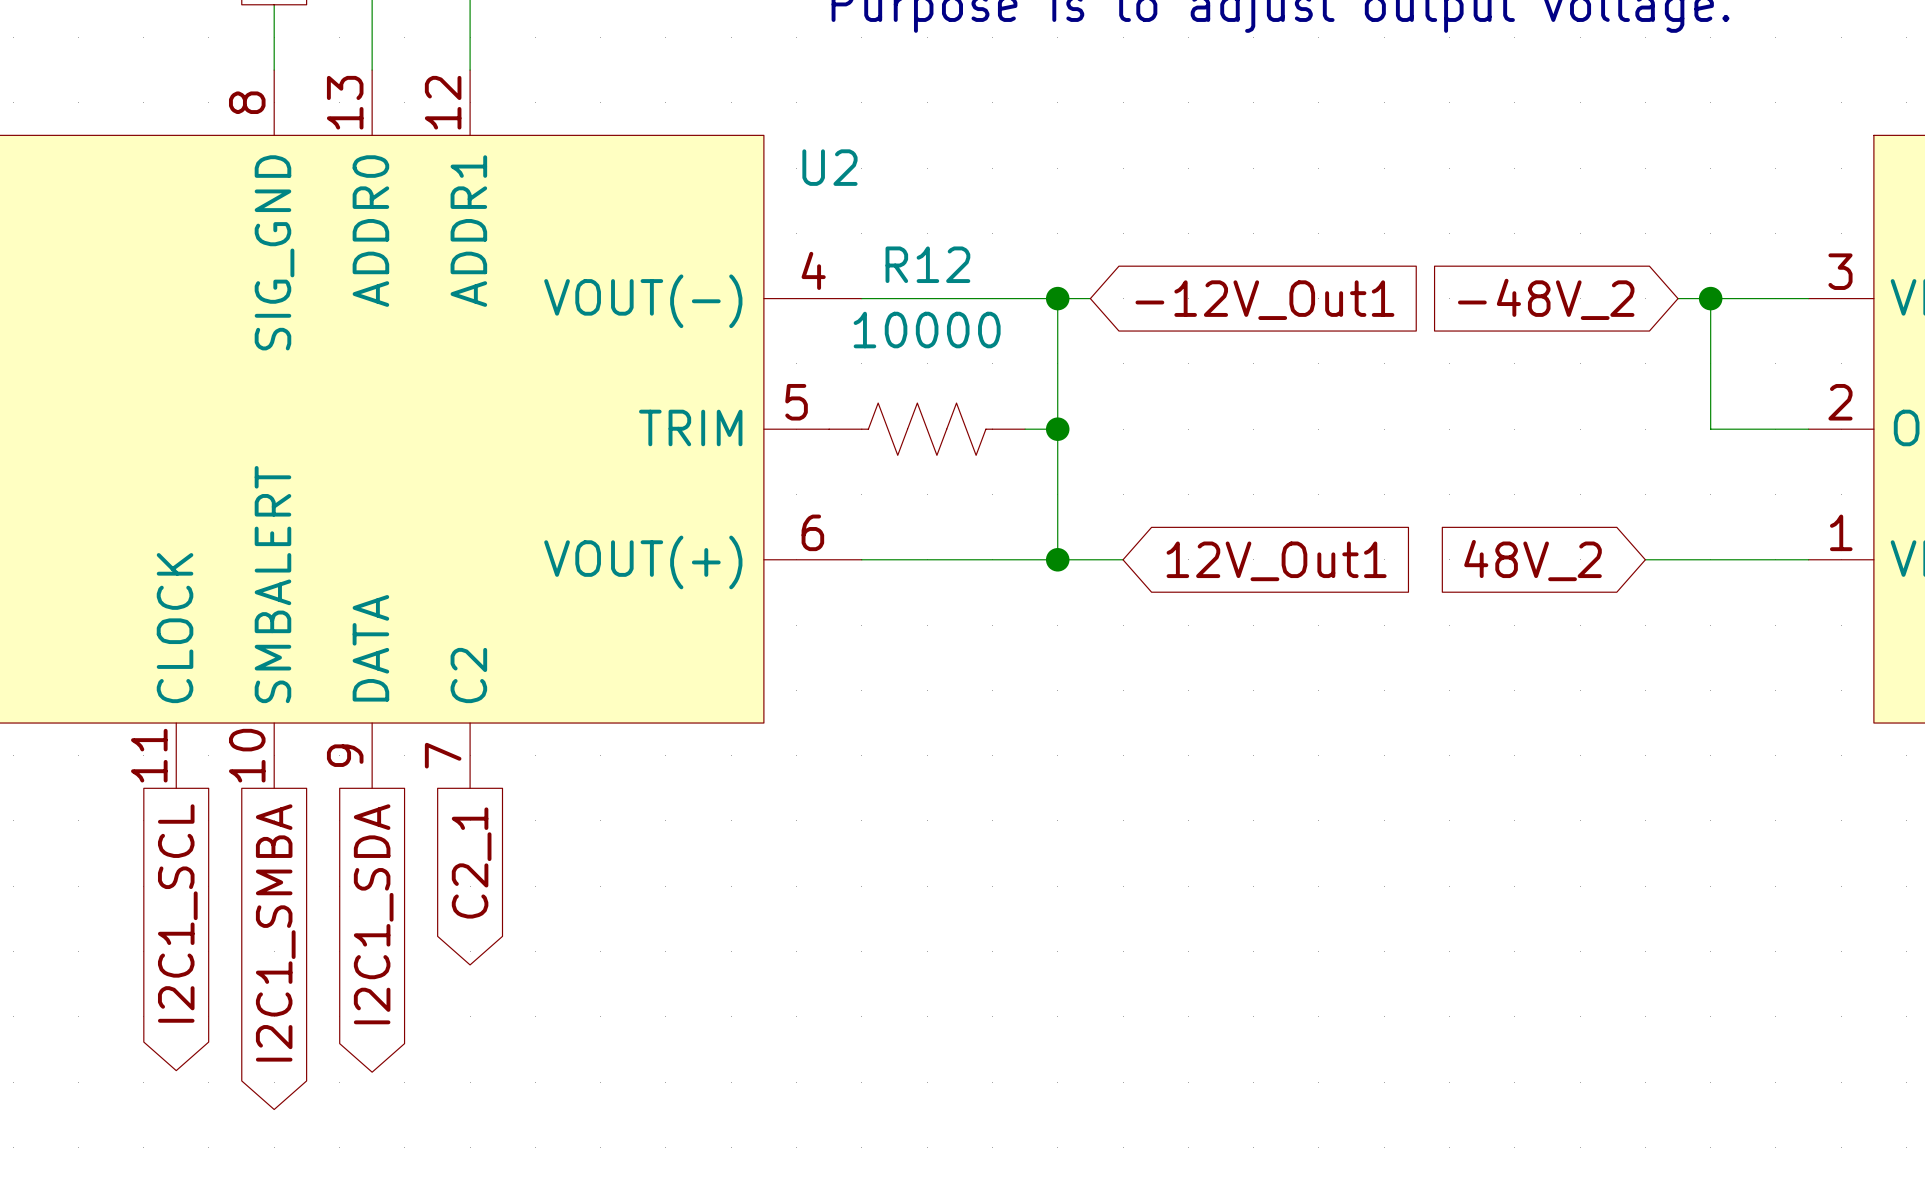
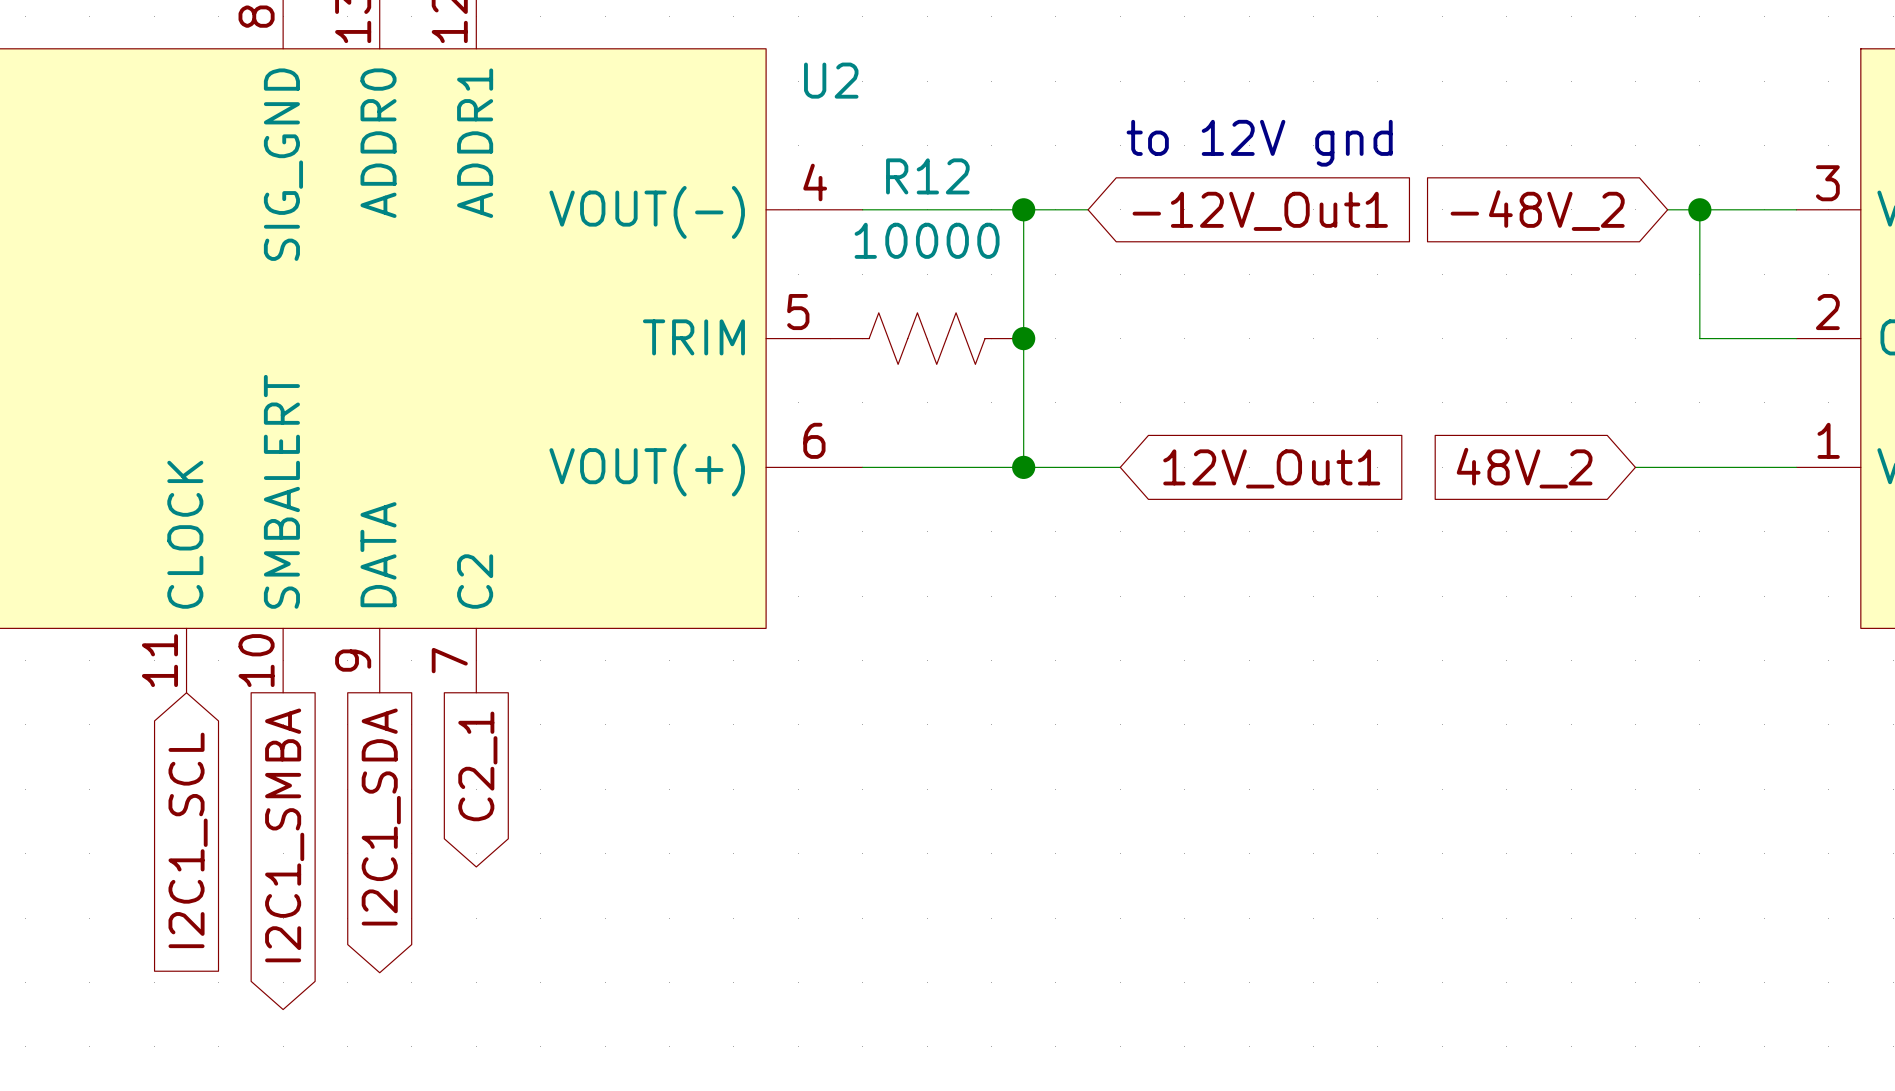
text: none -> to 12V gnd (1259, 143)
wire: (1057, 298) (1057, 559) -> (1023, 209) (1023, 467)
junction position: (1057, 298) -> (1023, 209)
wire: (1025, 429) (1057, 429) -> none
junction position: (1057, 429) -> (1023, 338)
junction position: (1057, 559) -> (1023, 467)
global label shape: output (177, 913) -> input (188, 840)

